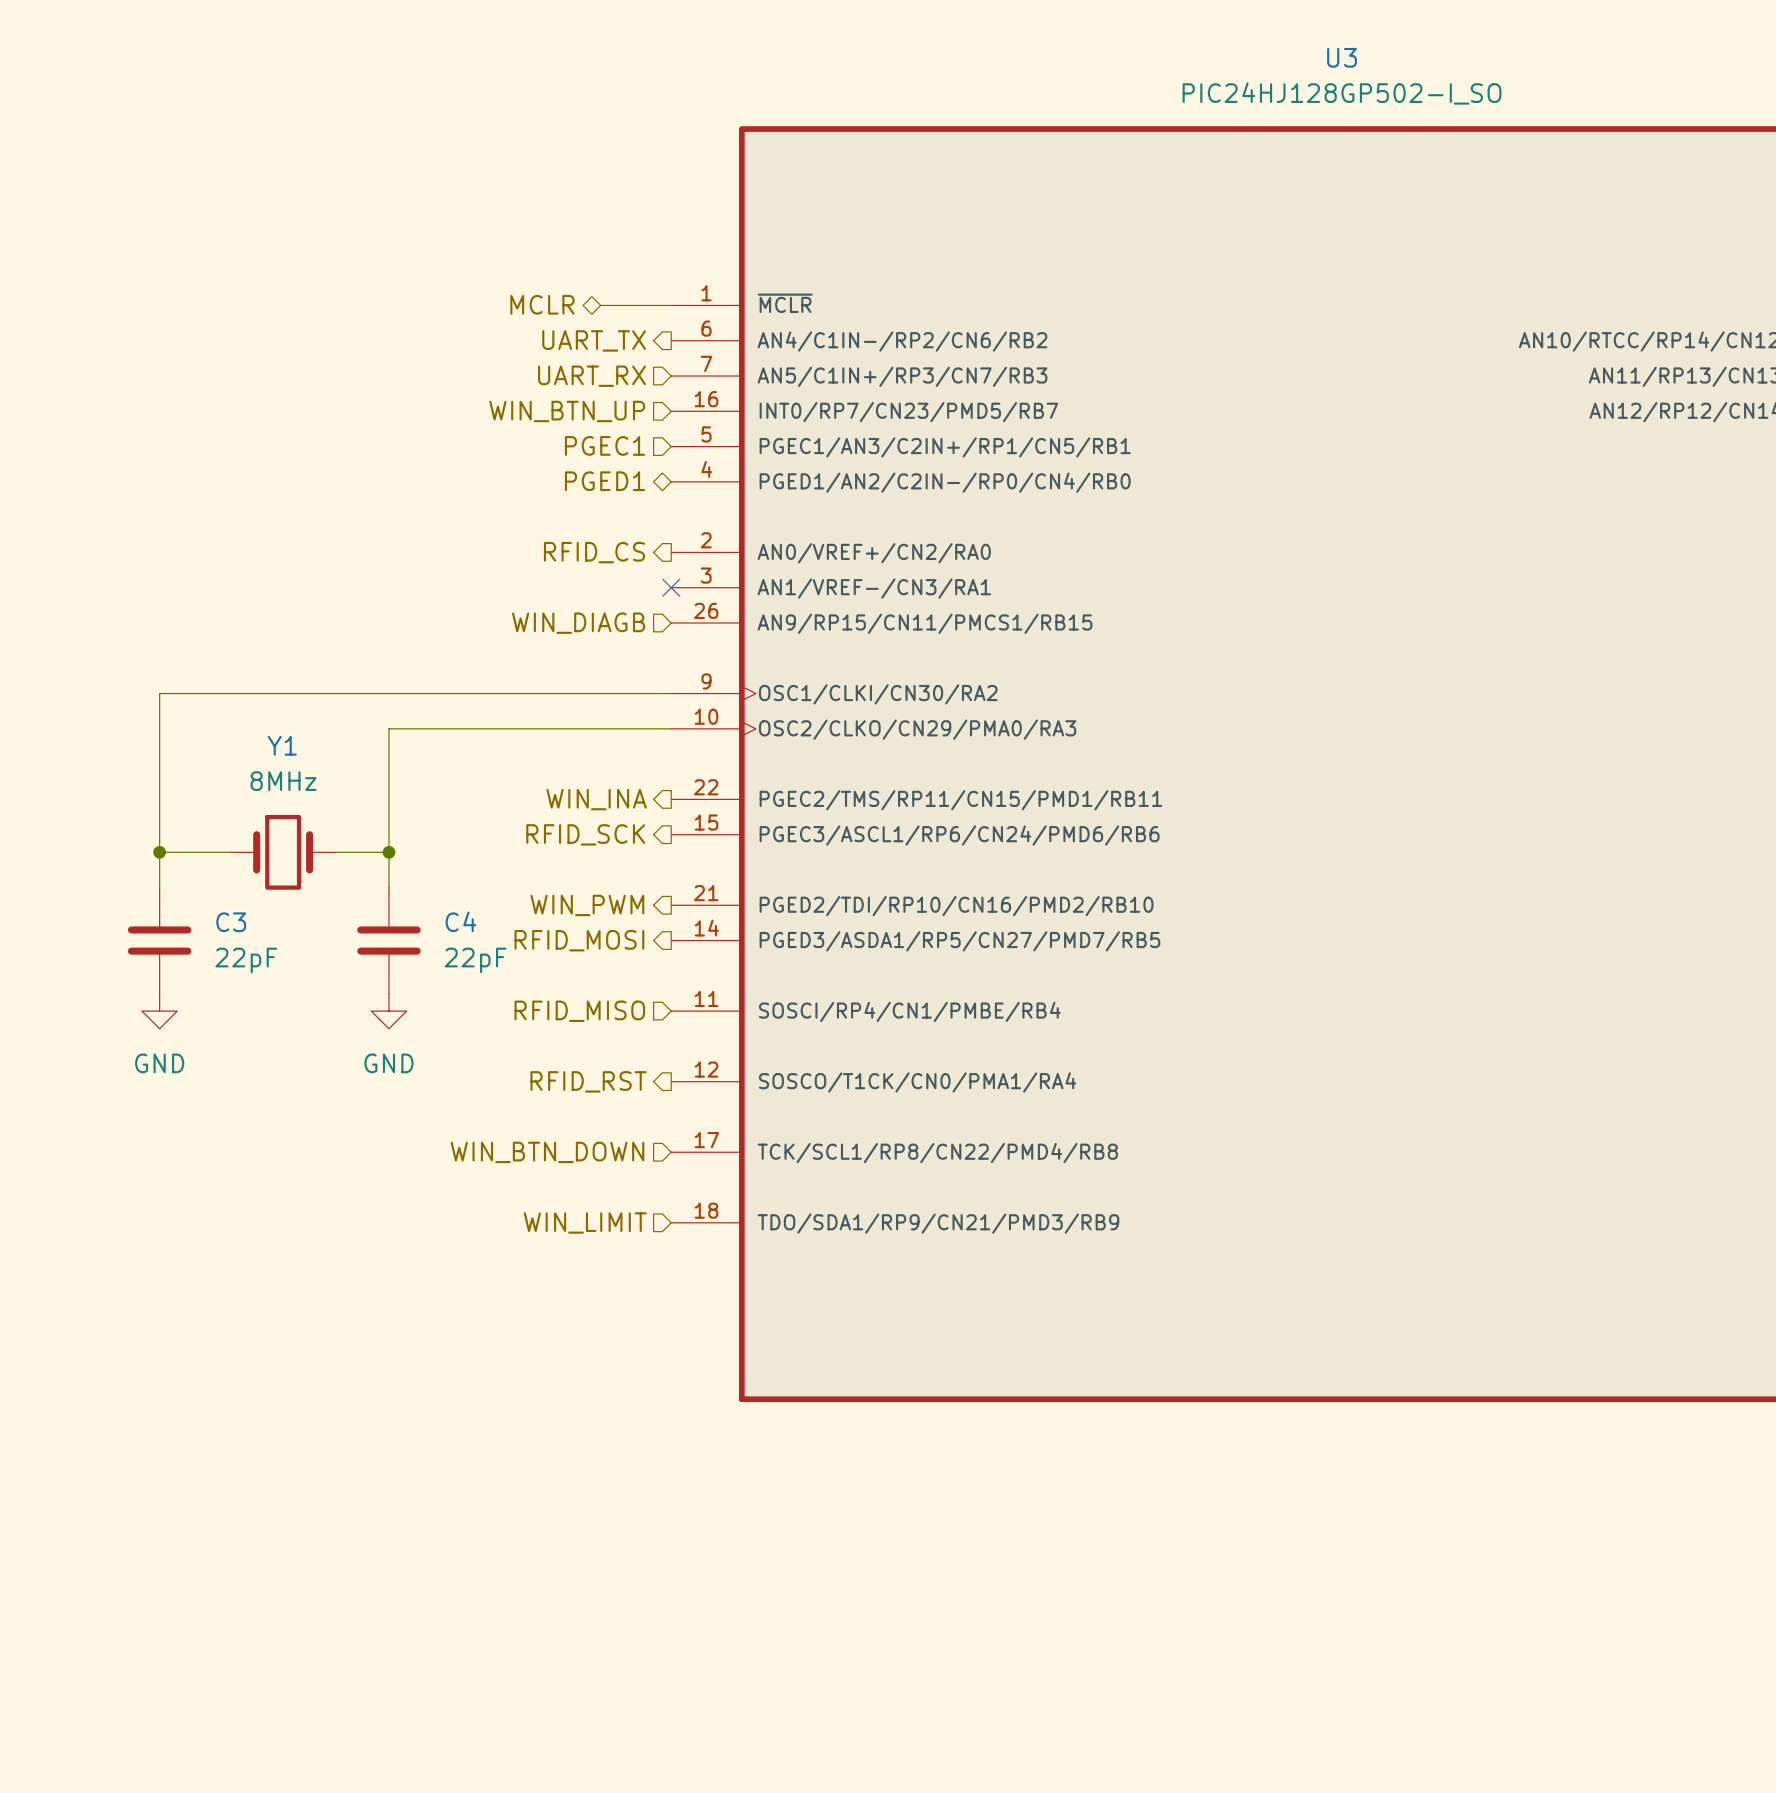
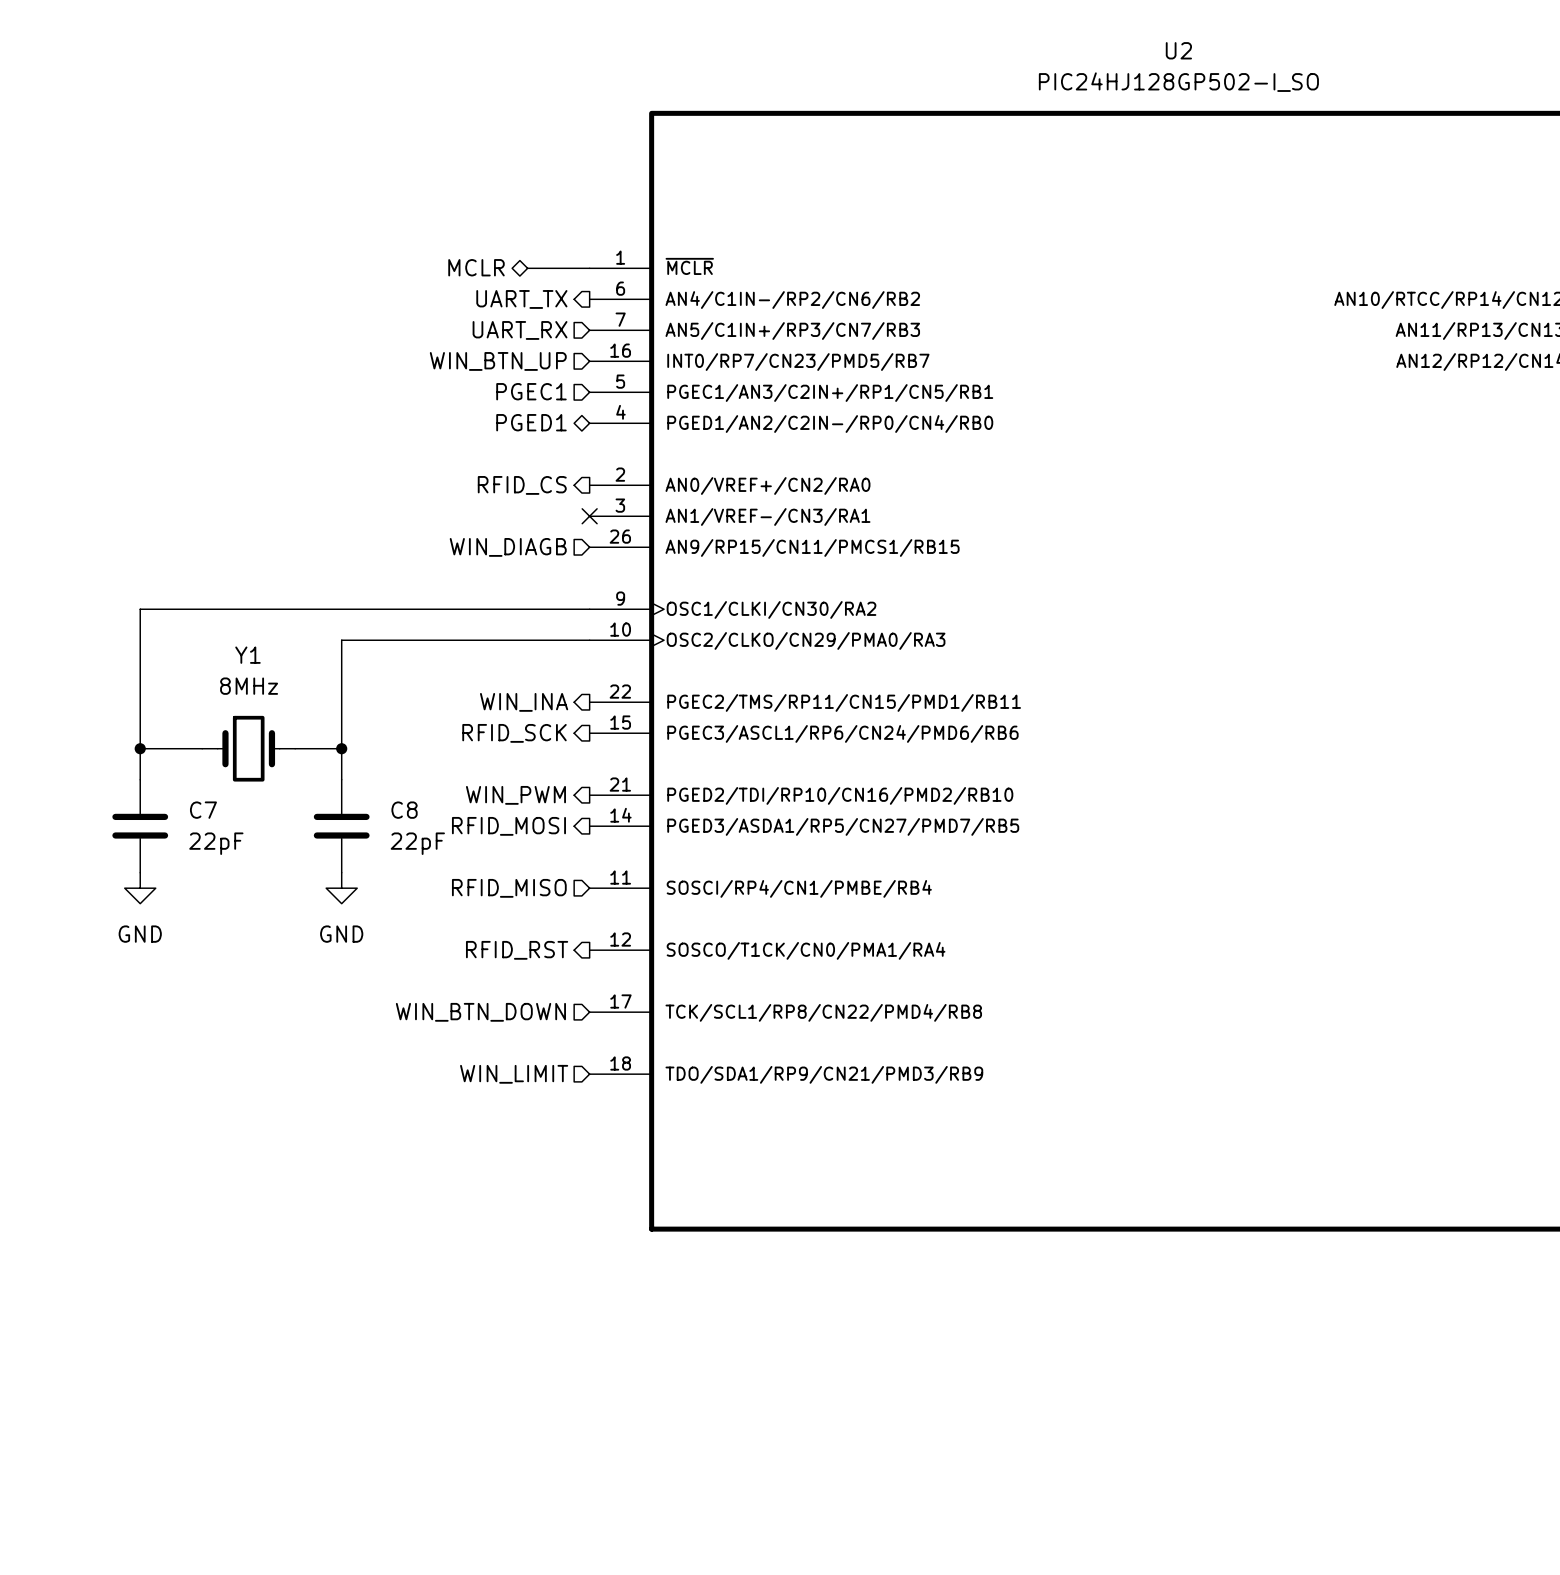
U3 name: U3 (1342, 57) -> U2 (1178, 50)
C4 name: C4 (460, 921) -> C8 (404, 810)
C3 name: C3 (231, 922) -> C7 (203, 810)

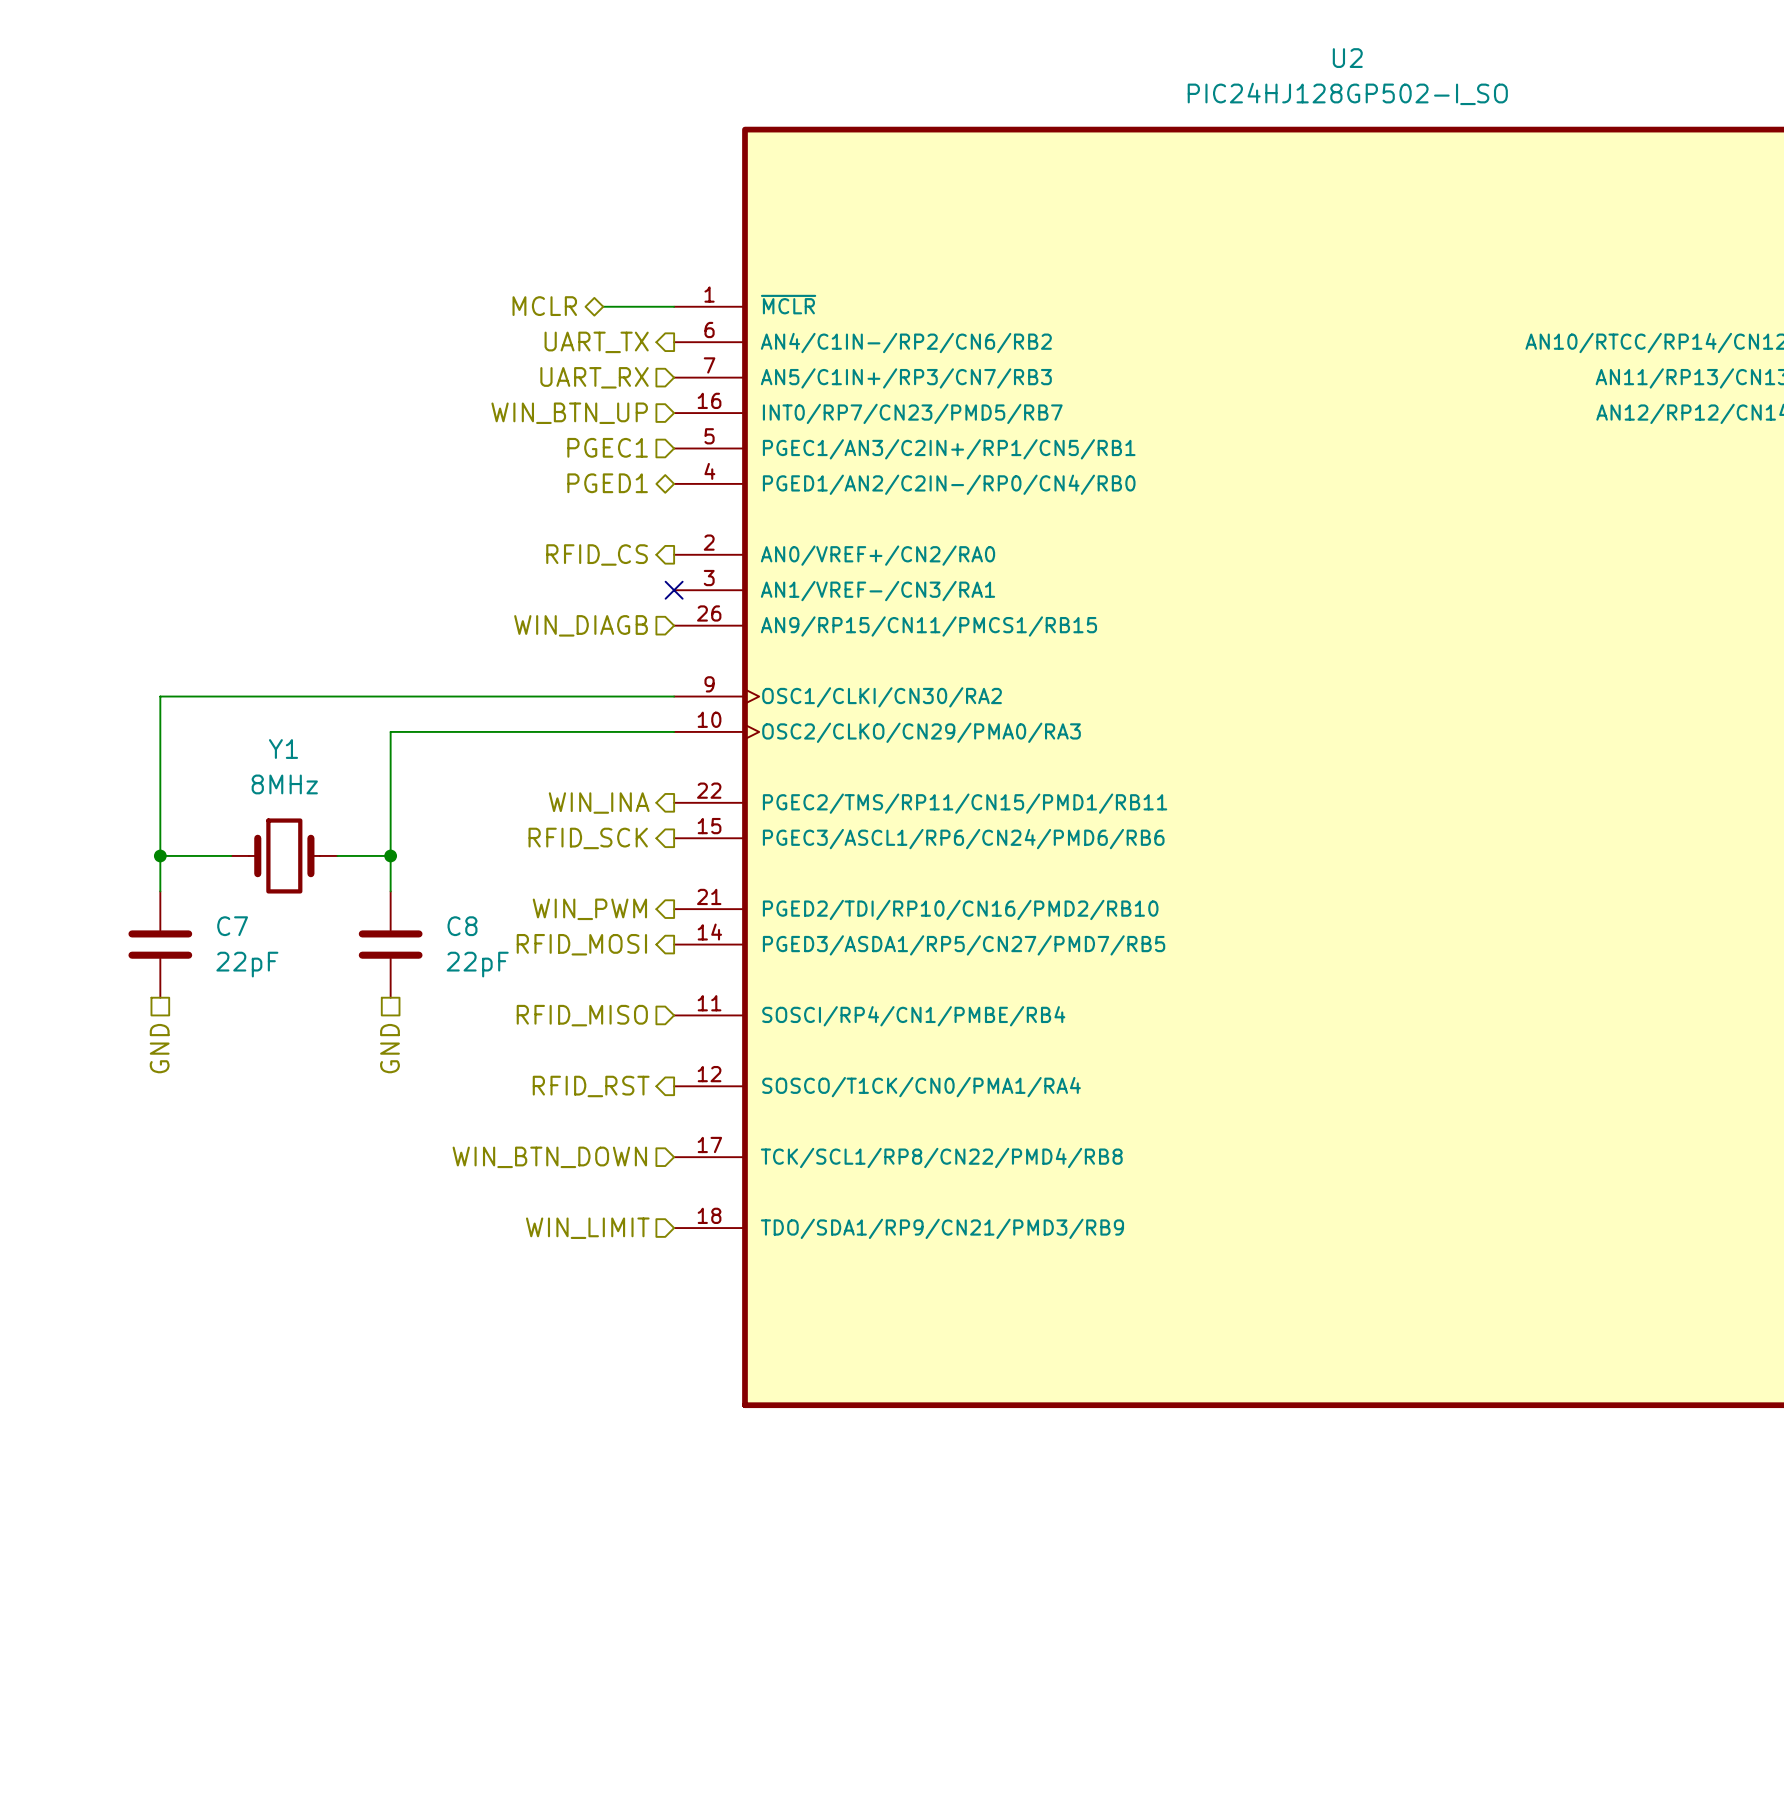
power symbol: GND (140, 888) -> none
power symbol: GND (341, 888) -> none
hierarchical label: none -> GND (159, 1048)
hierarchical label: none -> GND (389, 1048)

